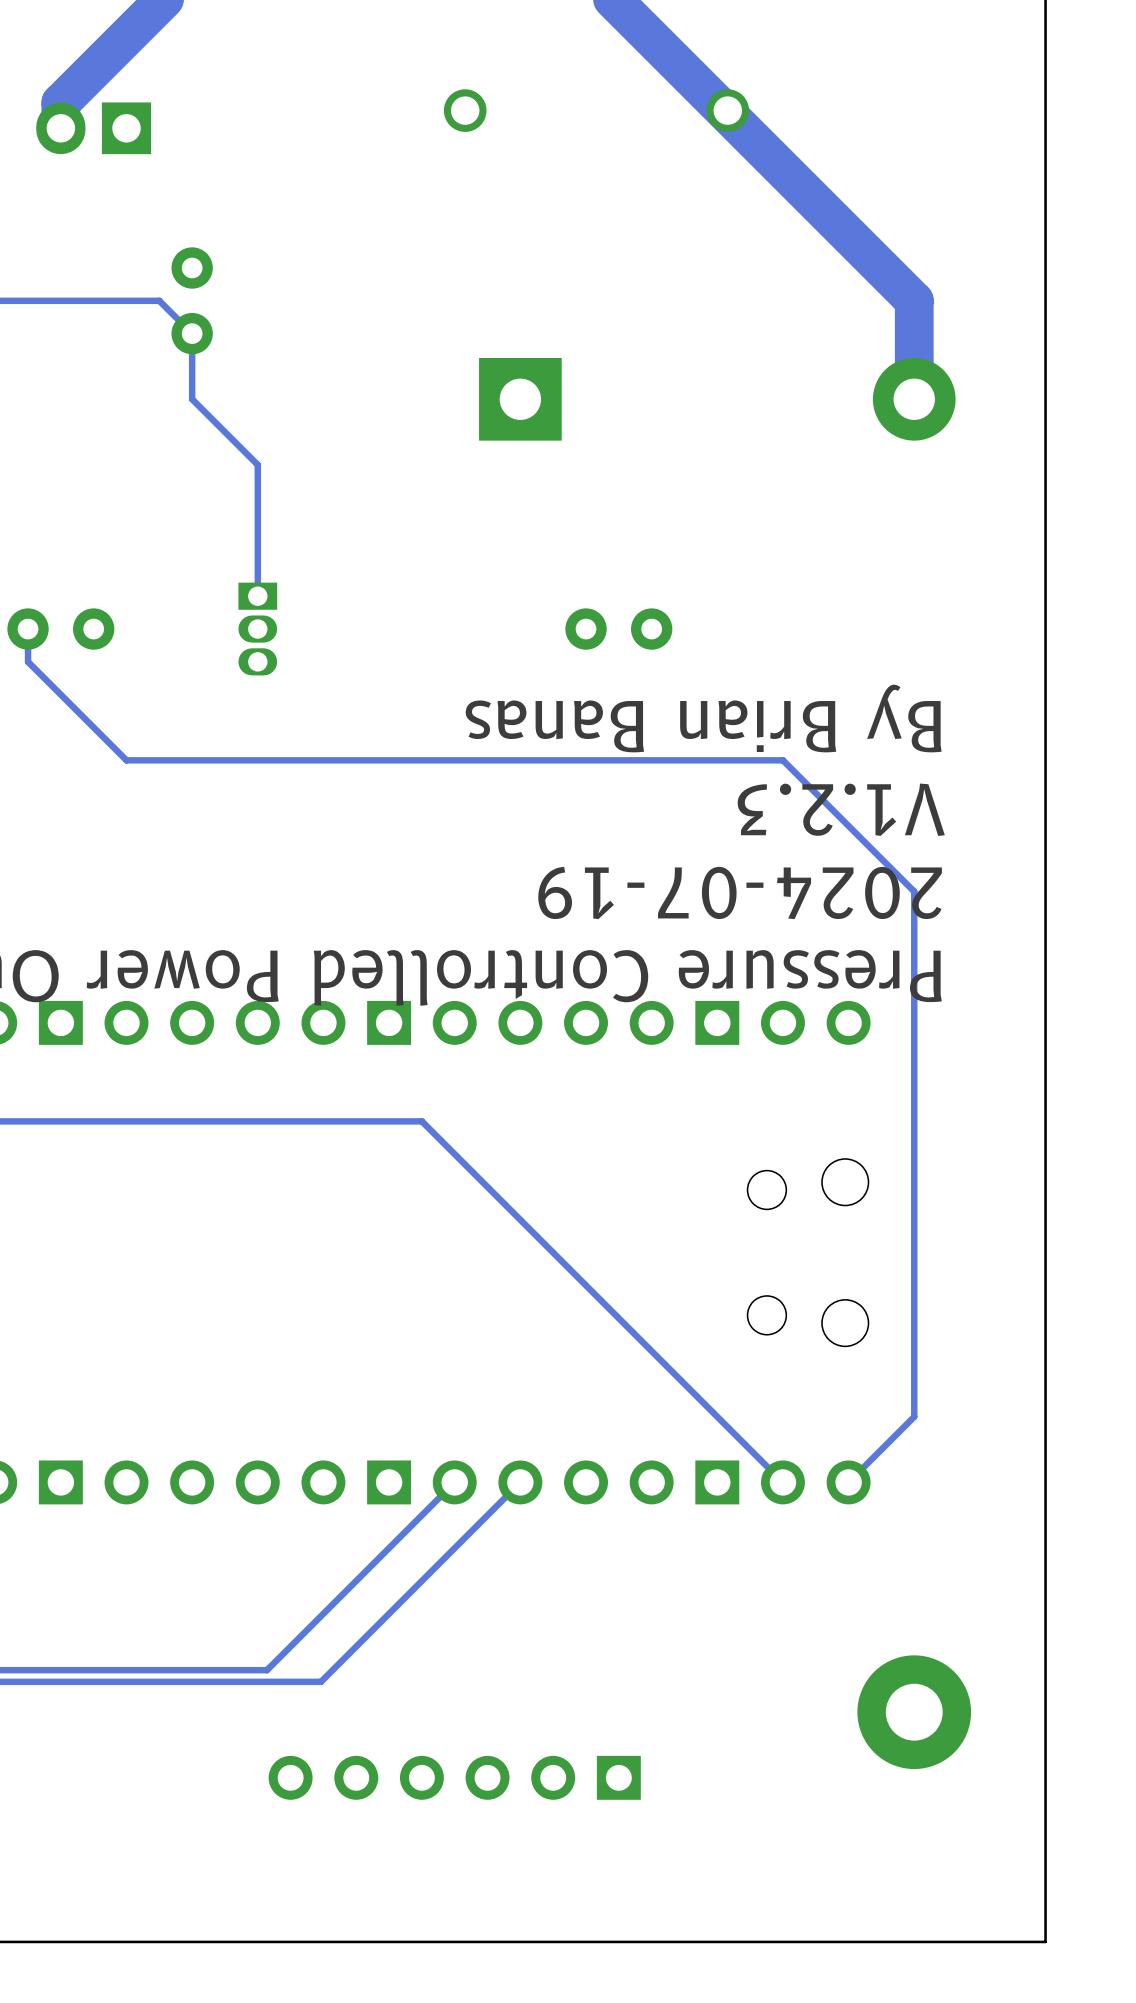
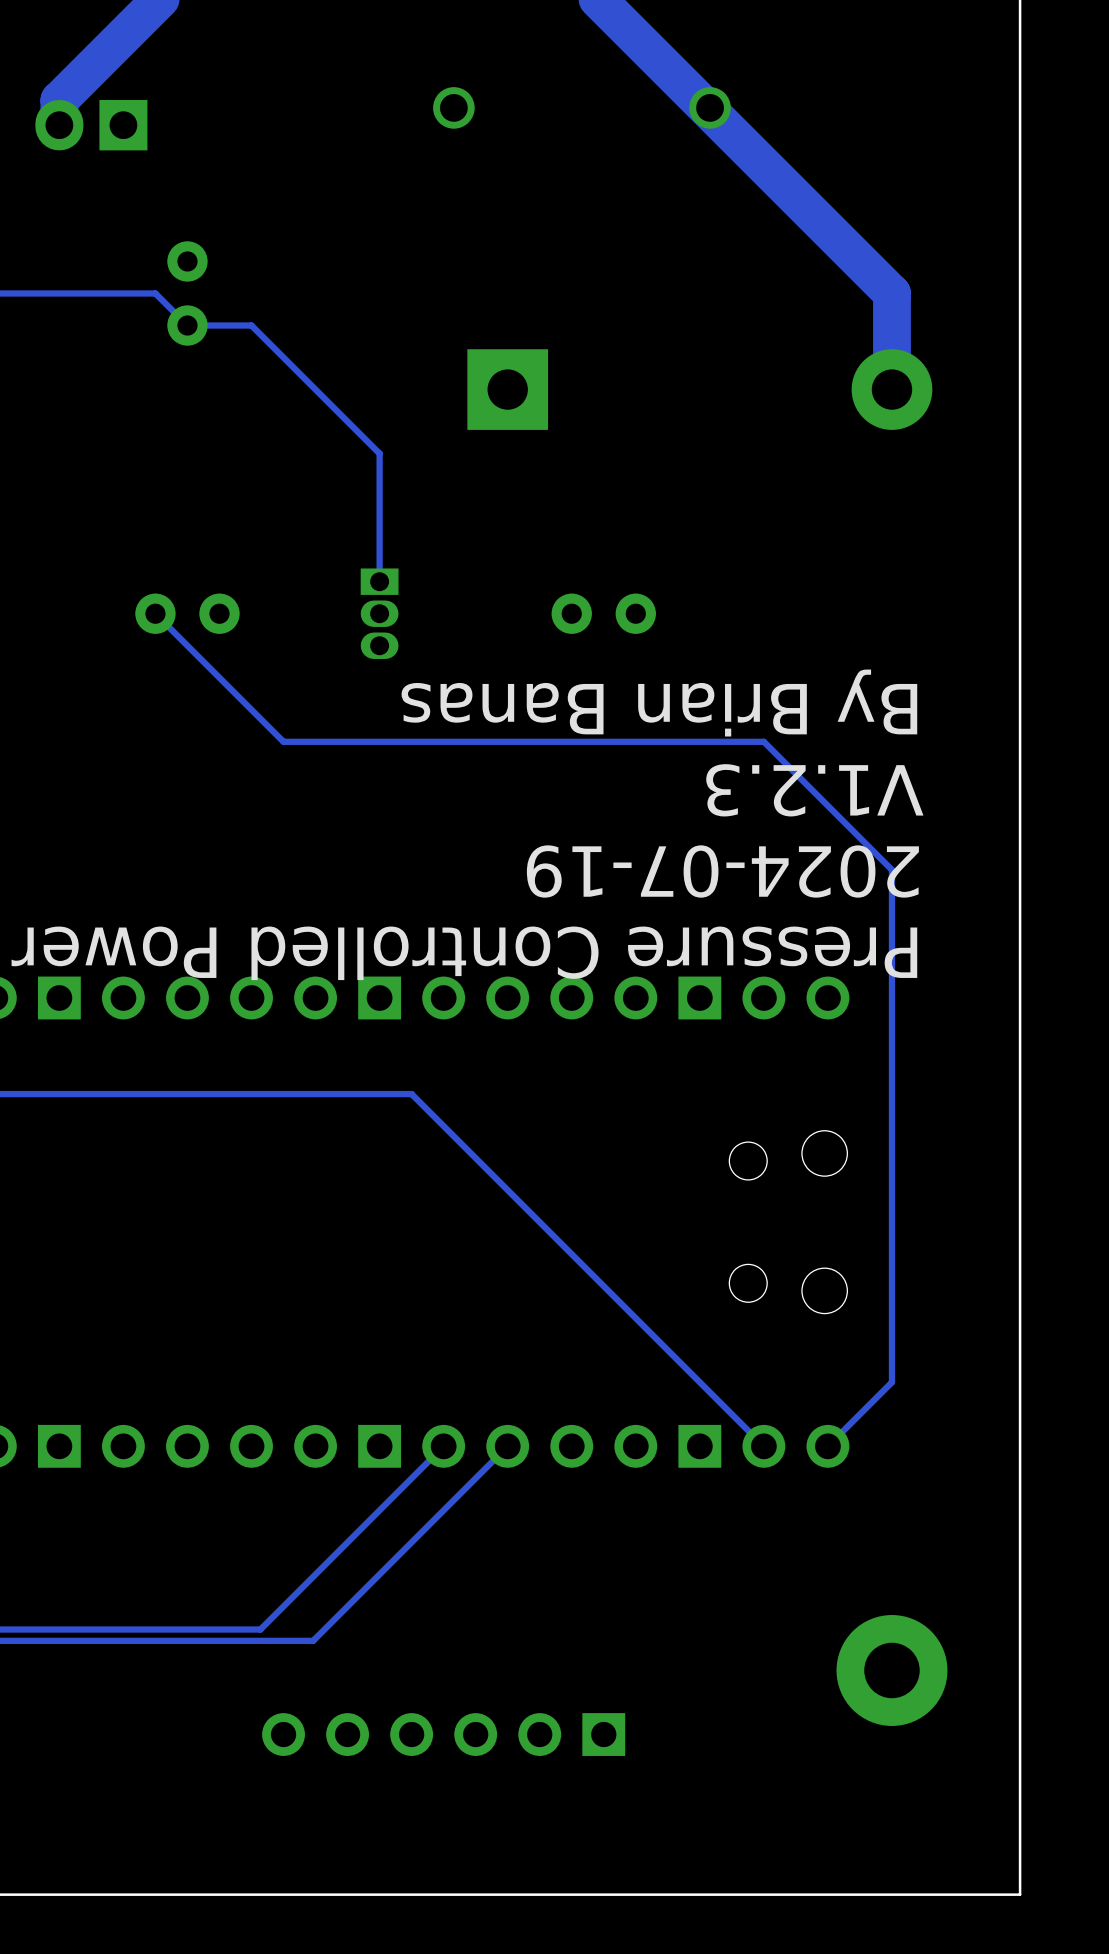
track: (192, 333) (192, 399) (257, 464) (257, 596) -> (187, 325) (251, 325) (379, 453) (379, 581)
track: (28, 629) (28, 661) (126, 760) (290, 760) -> (155, 613) (283, 741)
part position: (60, 629) -> (187, 613)
part position: (257, 629) -> (379, 613)

